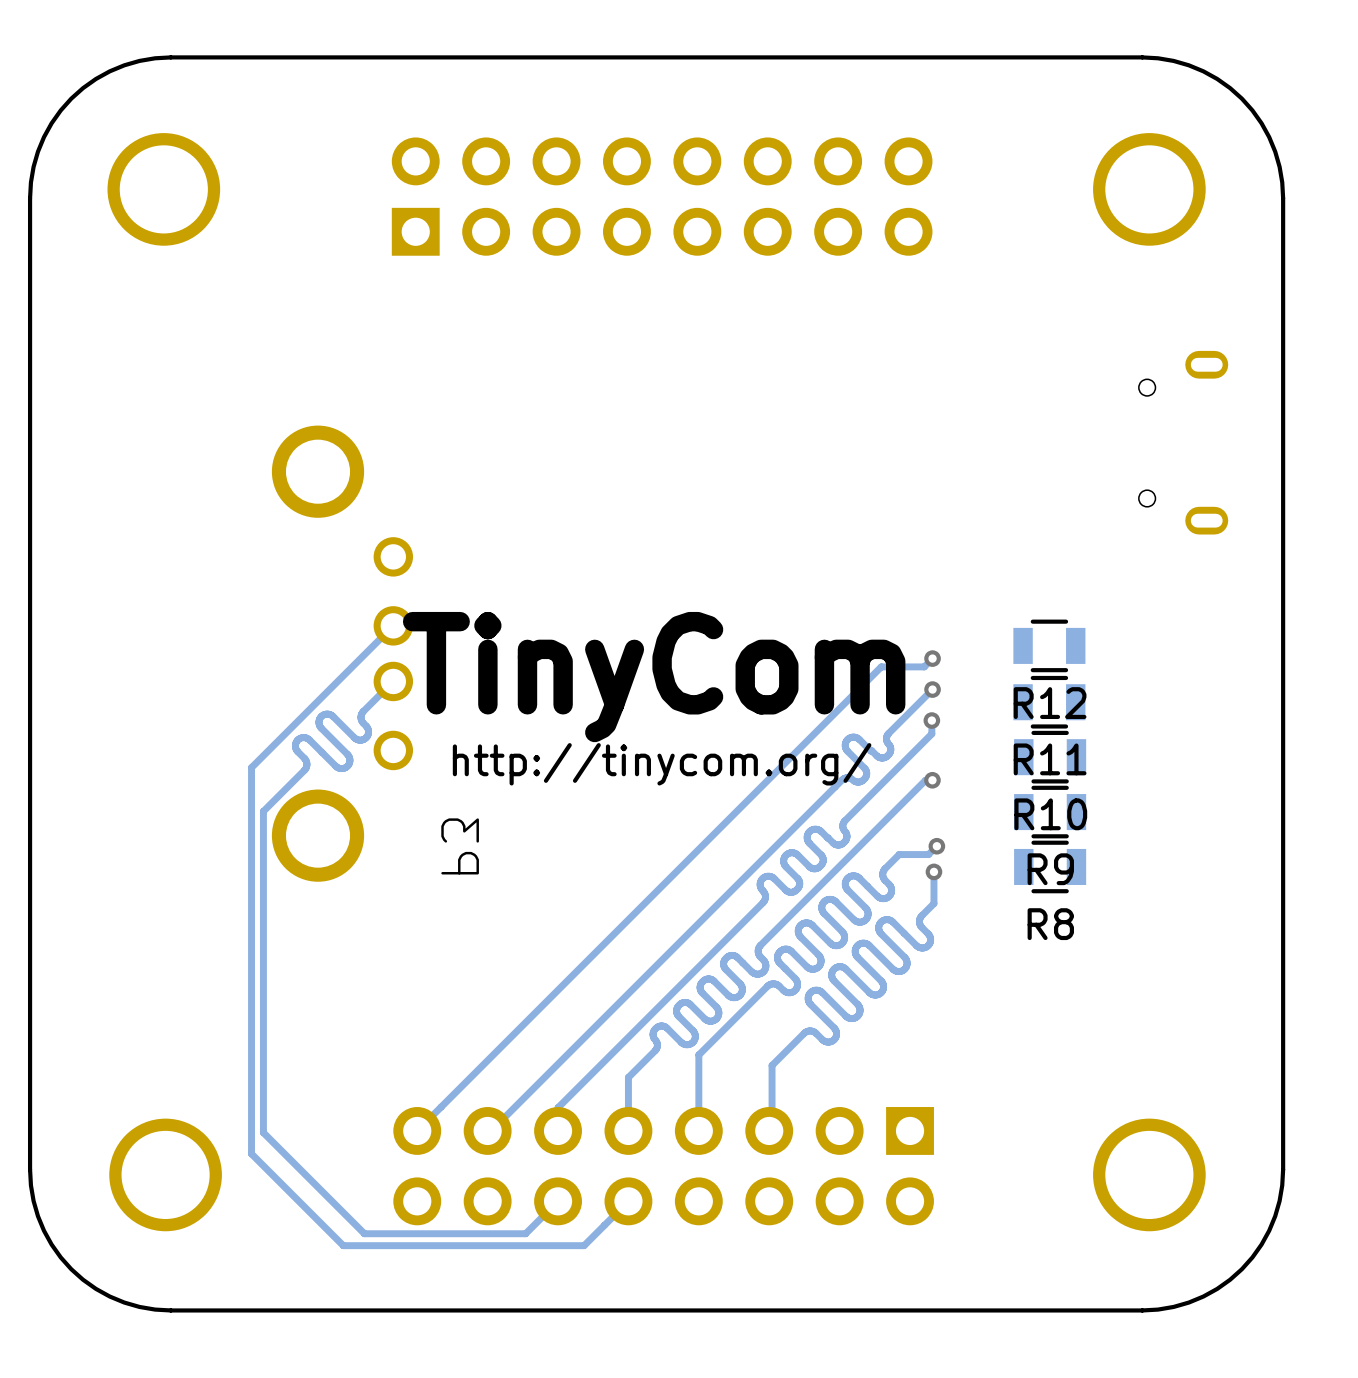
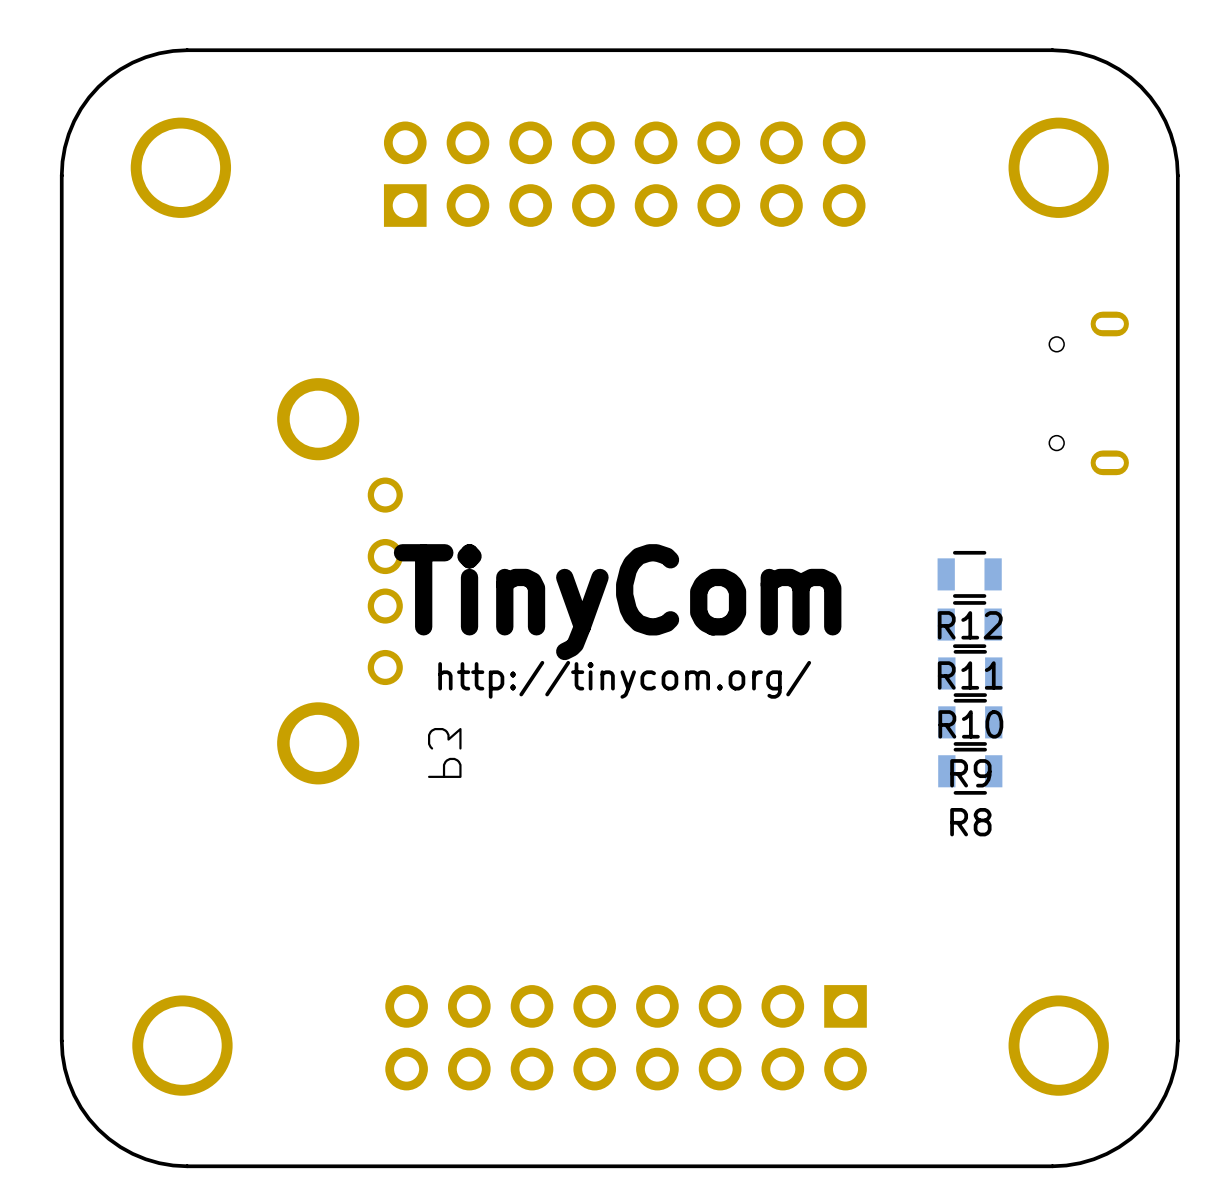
track: (393, 625) (251, 767) (251, 1153) (343, 1245) (584, 1245) (628, 1201) -> none
track: (932, 658) (924, 666) (881, 666) (417, 1130) -> none
via: (932, 658) -> none
track: (393, 681) (362, 712) (361, 720) (368, 730) (364, 738) (355, 738) (329, 714) (324, 714) (320, 717) (320, 726) (348, 755) (349, 761) (347, 766) (342, 768) (337, 767) (308, 738) (299, 738) (295, 746) (306, 761) (305, 768) (263, 811) (263, 1132) (364, 1233) (525, 1233) (558, 1201) -> none
track: (932, 689) (887, 734) (886, 739) (890, 750) (886, 756) (878, 756) (856, 737) (847, 739) (845, 748) (865, 769) (866, 774) (864, 778) (858, 782) (848, 777) (842, 779) (491, 1130) (487, 1130) -> none
via: (932, 689) -> none
track: (931, 720) (931, 733) (843, 822) (843, 828) (846, 835) (844, 841) (837, 845) (827, 837) -> none
via: (931, 720) -> none
track: (932, 780) (925, 780) (760, 945) (758, 953) (765, 964) (763, 971) (758, 974) (753, 972) (734, 955) (729, 955) (725, 958) (723, 963) (724, 968) (741, 986) (739, 995) (735, 997) (729, 996) (711, 979) (706, 979) (702, 982) (700, 986) (701, 991) (718, 1010) (716, 1018) (711, 1021) (706, 1019) (687, 1002) (682, 1002) (678, 1005) (676, 1010) (677, 1015) (694, 1033) (692, 1042) (687, 1044) (682, 1043) (664, 1026) (659, 1026) (655, 1029) (653, 1035) (657, 1042) (656, 1049) (628, 1077) (628, 1130) -> none
via: (932, 780) -> none
track: (827, 838) (816, 829) (811, 830) (807, 834) (808, 841) (822, 857) (822, 864) (816, 868) (810, 867) (794, 853) (789, 853) (784, 856) (784, 865) (799, 881) (799, 886) (794, 891) (787, 891) (771, 876) (762, 878) (760, 885) (765, 895) (763, 902) (558, 1107) (558, 1130) -> none
track: (936, 846) (928, 854) (899, 854) (885, 868) (883, 877) (891, 889) (890, 894) (886, 898) (878, 897) (857, 877) (852, 875) (847, 878) (845, 883) (846, 888) (867, 911) (867, 916) (864, 920) (855, 920) (832, 899) (824, 901) (821, 906) (822, 912) (844, 934) (844, 940) (840, 944) (831, 944) (809, 923) (800, 925) (798, 933) (819, 956) (819, 965) (815, 968) (810, 968) (790, 950) (781, 950) (777, 955) (777, 960) (796, 980) (796, 988) (788, 992) (776, 984) (768, 985) (698, 1054) (698, 1130) -> none
via: (936, 846) -> none
track: (933, 871) (933, 903) (919, 920) (920, 926) (930, 937) (928, 945) (923, 948) (917, 946) (889, 920) (882, 920) (879, 925) (879, 932) (905, 958) (907, 964) (904, 969) (899, 971) (894, 970) (866, 943) (859, 944) (855, 948) (856, 955) (882, 982) (883, 987) (881, 992) (876, 995) (870, 993) (842, 967) (837, 967) (832, 970) (832, 979) (858, 1005) (860, 1011) (857, 1016) (852, 1018) (847, 1017) (819, 990) (813, 990) (809, 994) (809, 1002) (835, 1029) (836, 1036) (832, 1040) (827, 1042) (814, 1032) (807, 1031) (772, 1065) (772, 1128) (769, 1130) -> none
via: (933, 871) -> none

